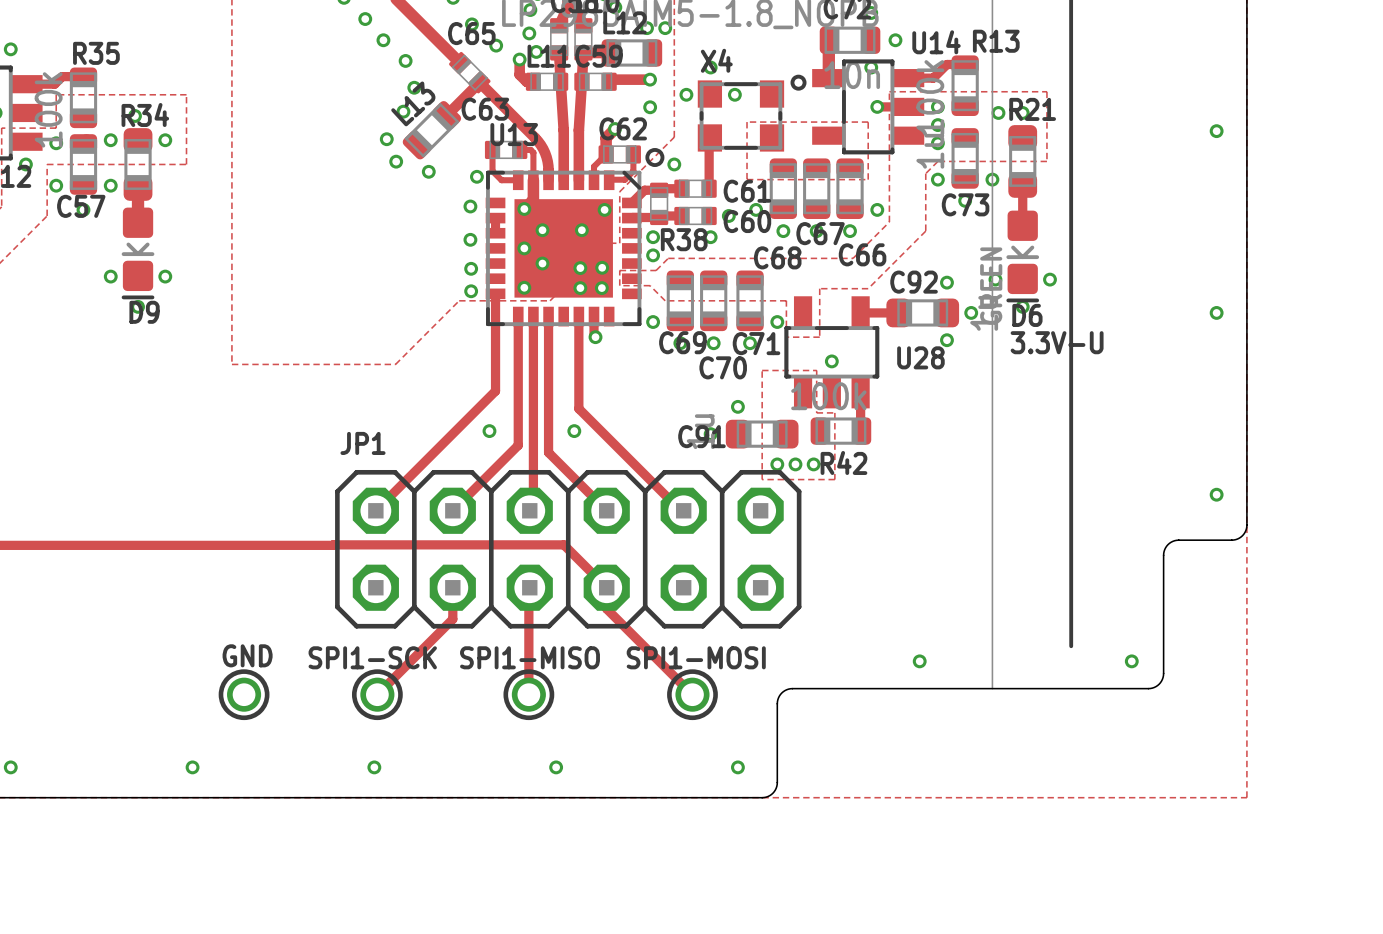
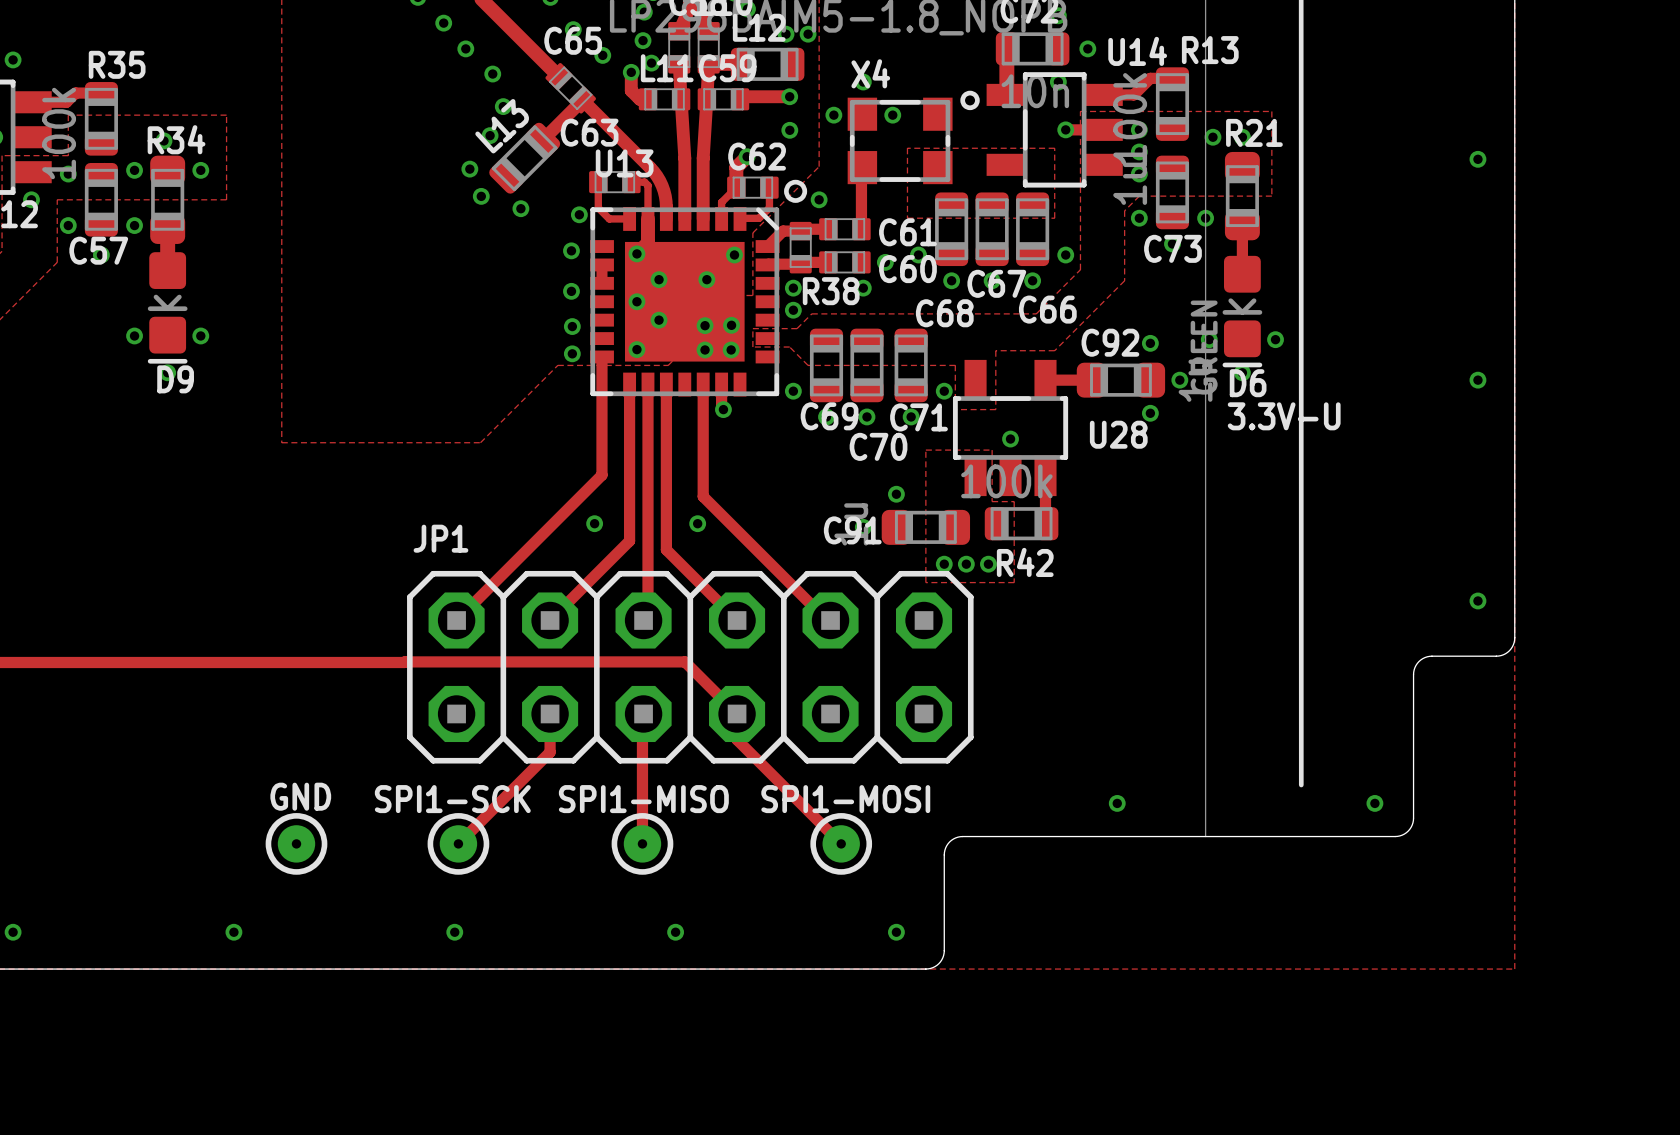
GND footprint: [218, 669, 270, 721] -> [265, 813, 328, 875]
SPI1-SCK footprint: [351, 669, 403, 721] -> [427, 813, 490, 875]
SPI1-MISO footprint: [503, 669, 555, 721] -> [611, 813, 674, 875]
SPI1-MOSI footprint: [667, 669, 718, 721] -> [810, 813, 873, 875]

